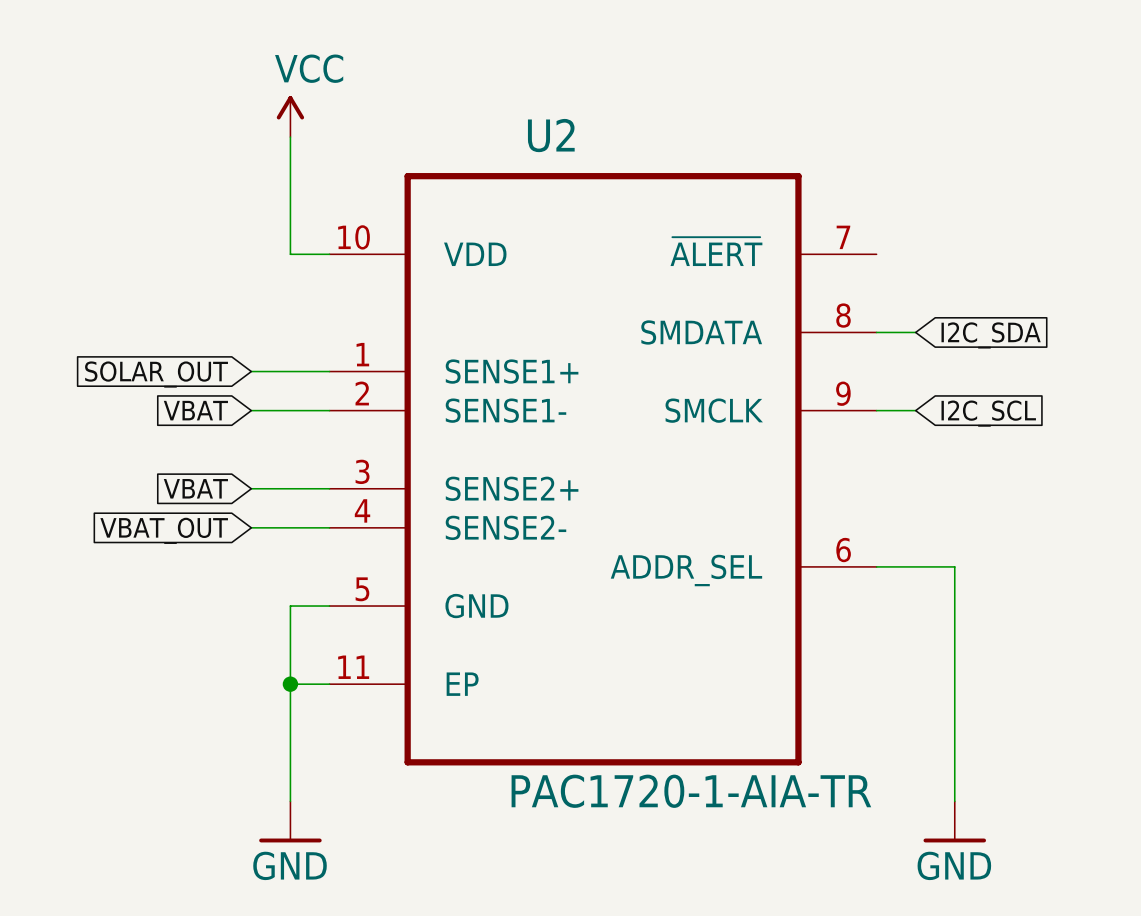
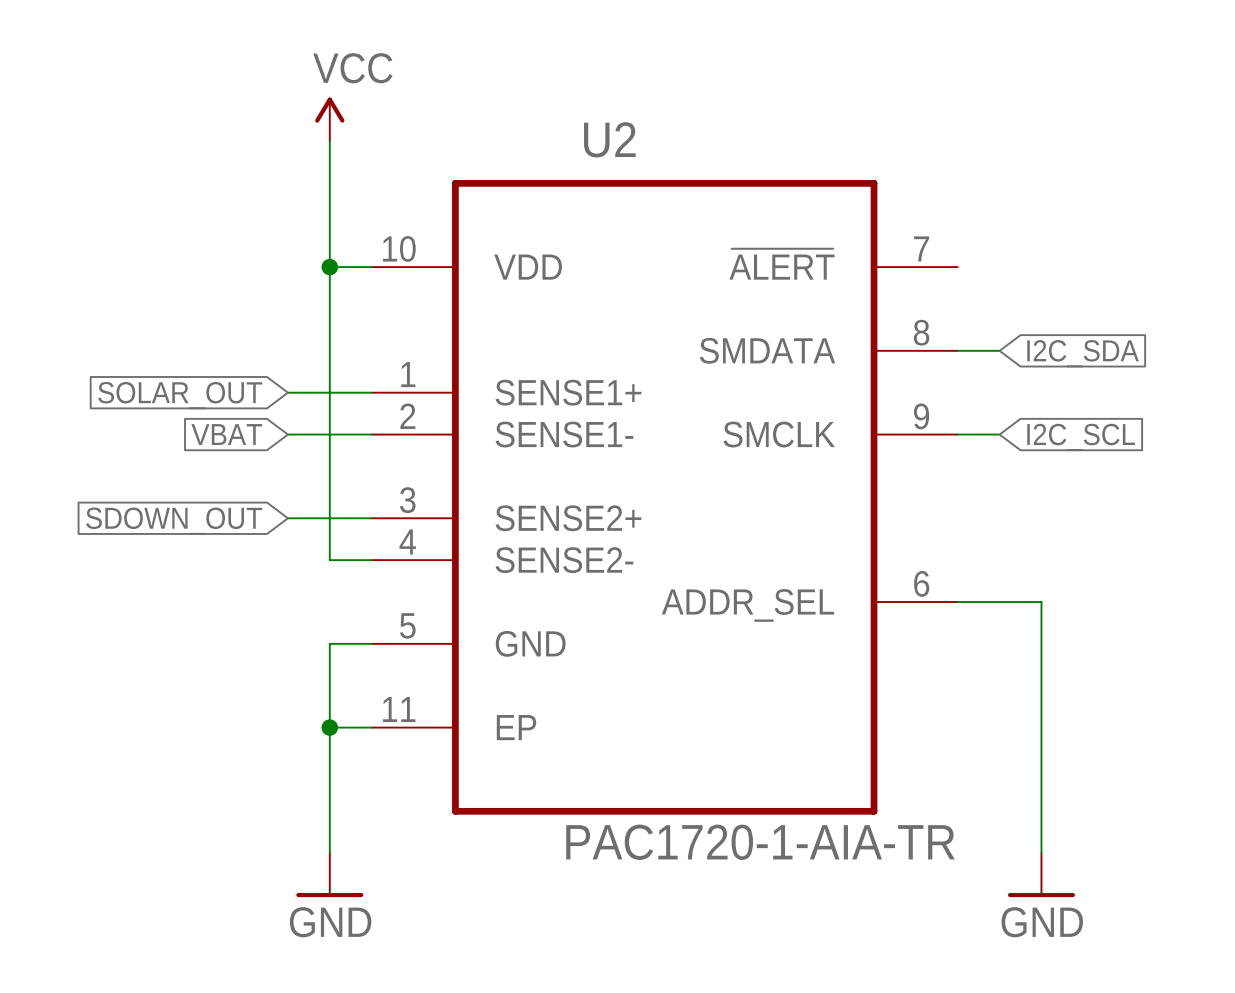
junction: none -> (329, 267)
global label: VBAT (195, 488) -> SDOWN_OUT (174, 521)
wire: (251, 527) (290, 527) -> (329, 267) (329, 560)
global label: VBAT_OUT (164, 530) -> none

